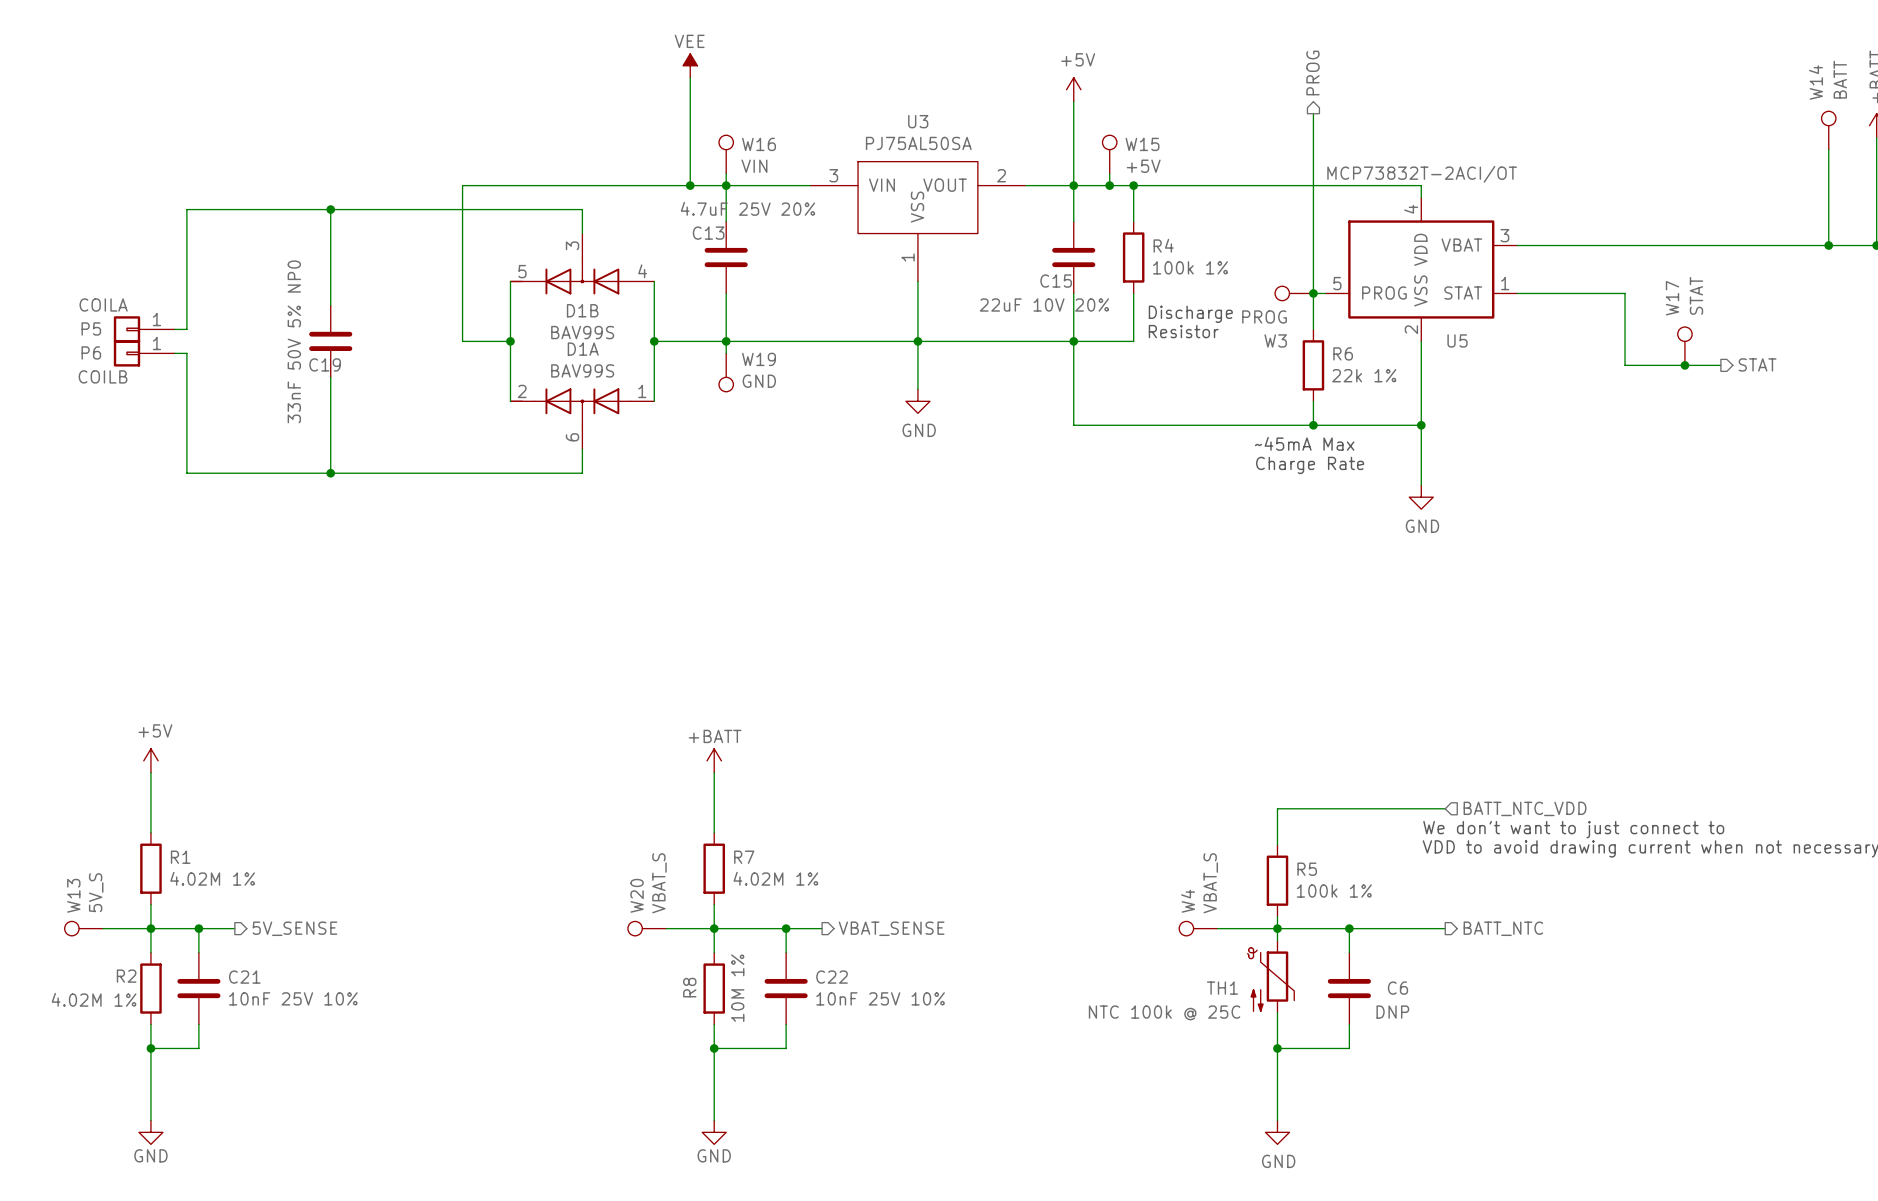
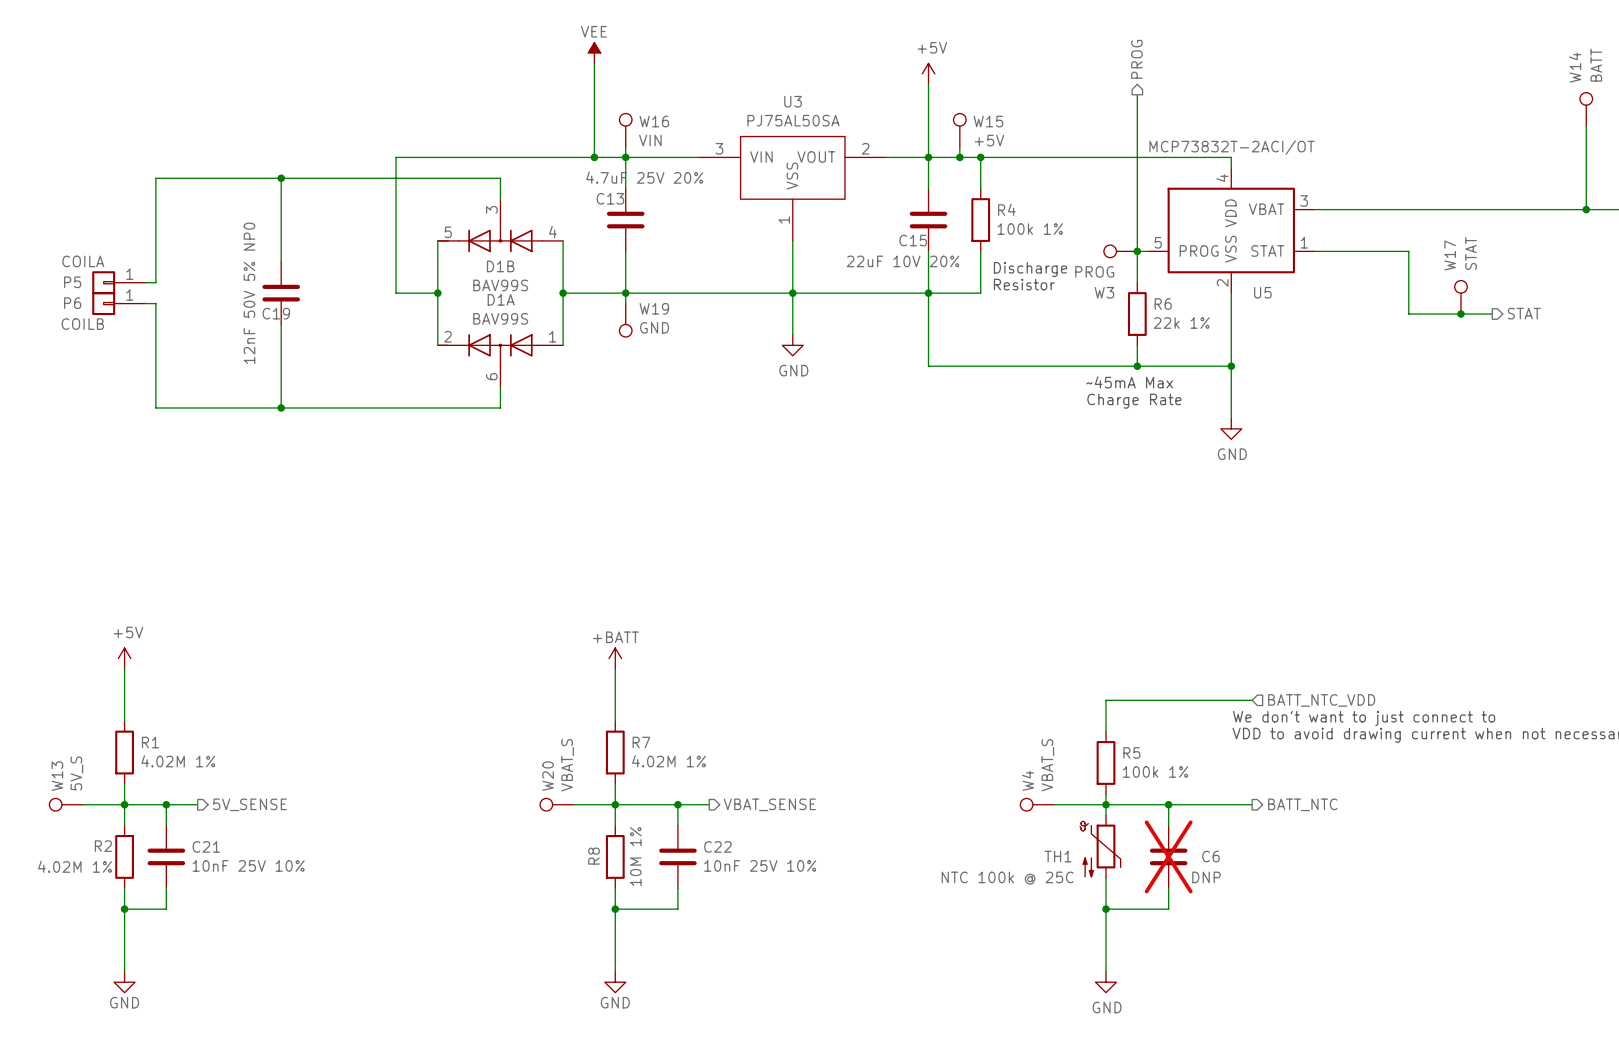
C19 value: 33nF 50V 5% NP0 (294, 341) -> 12nF 50V 5% NP0 (249, 293)
C6 do-not-place cross: none -> (1168, 856)

